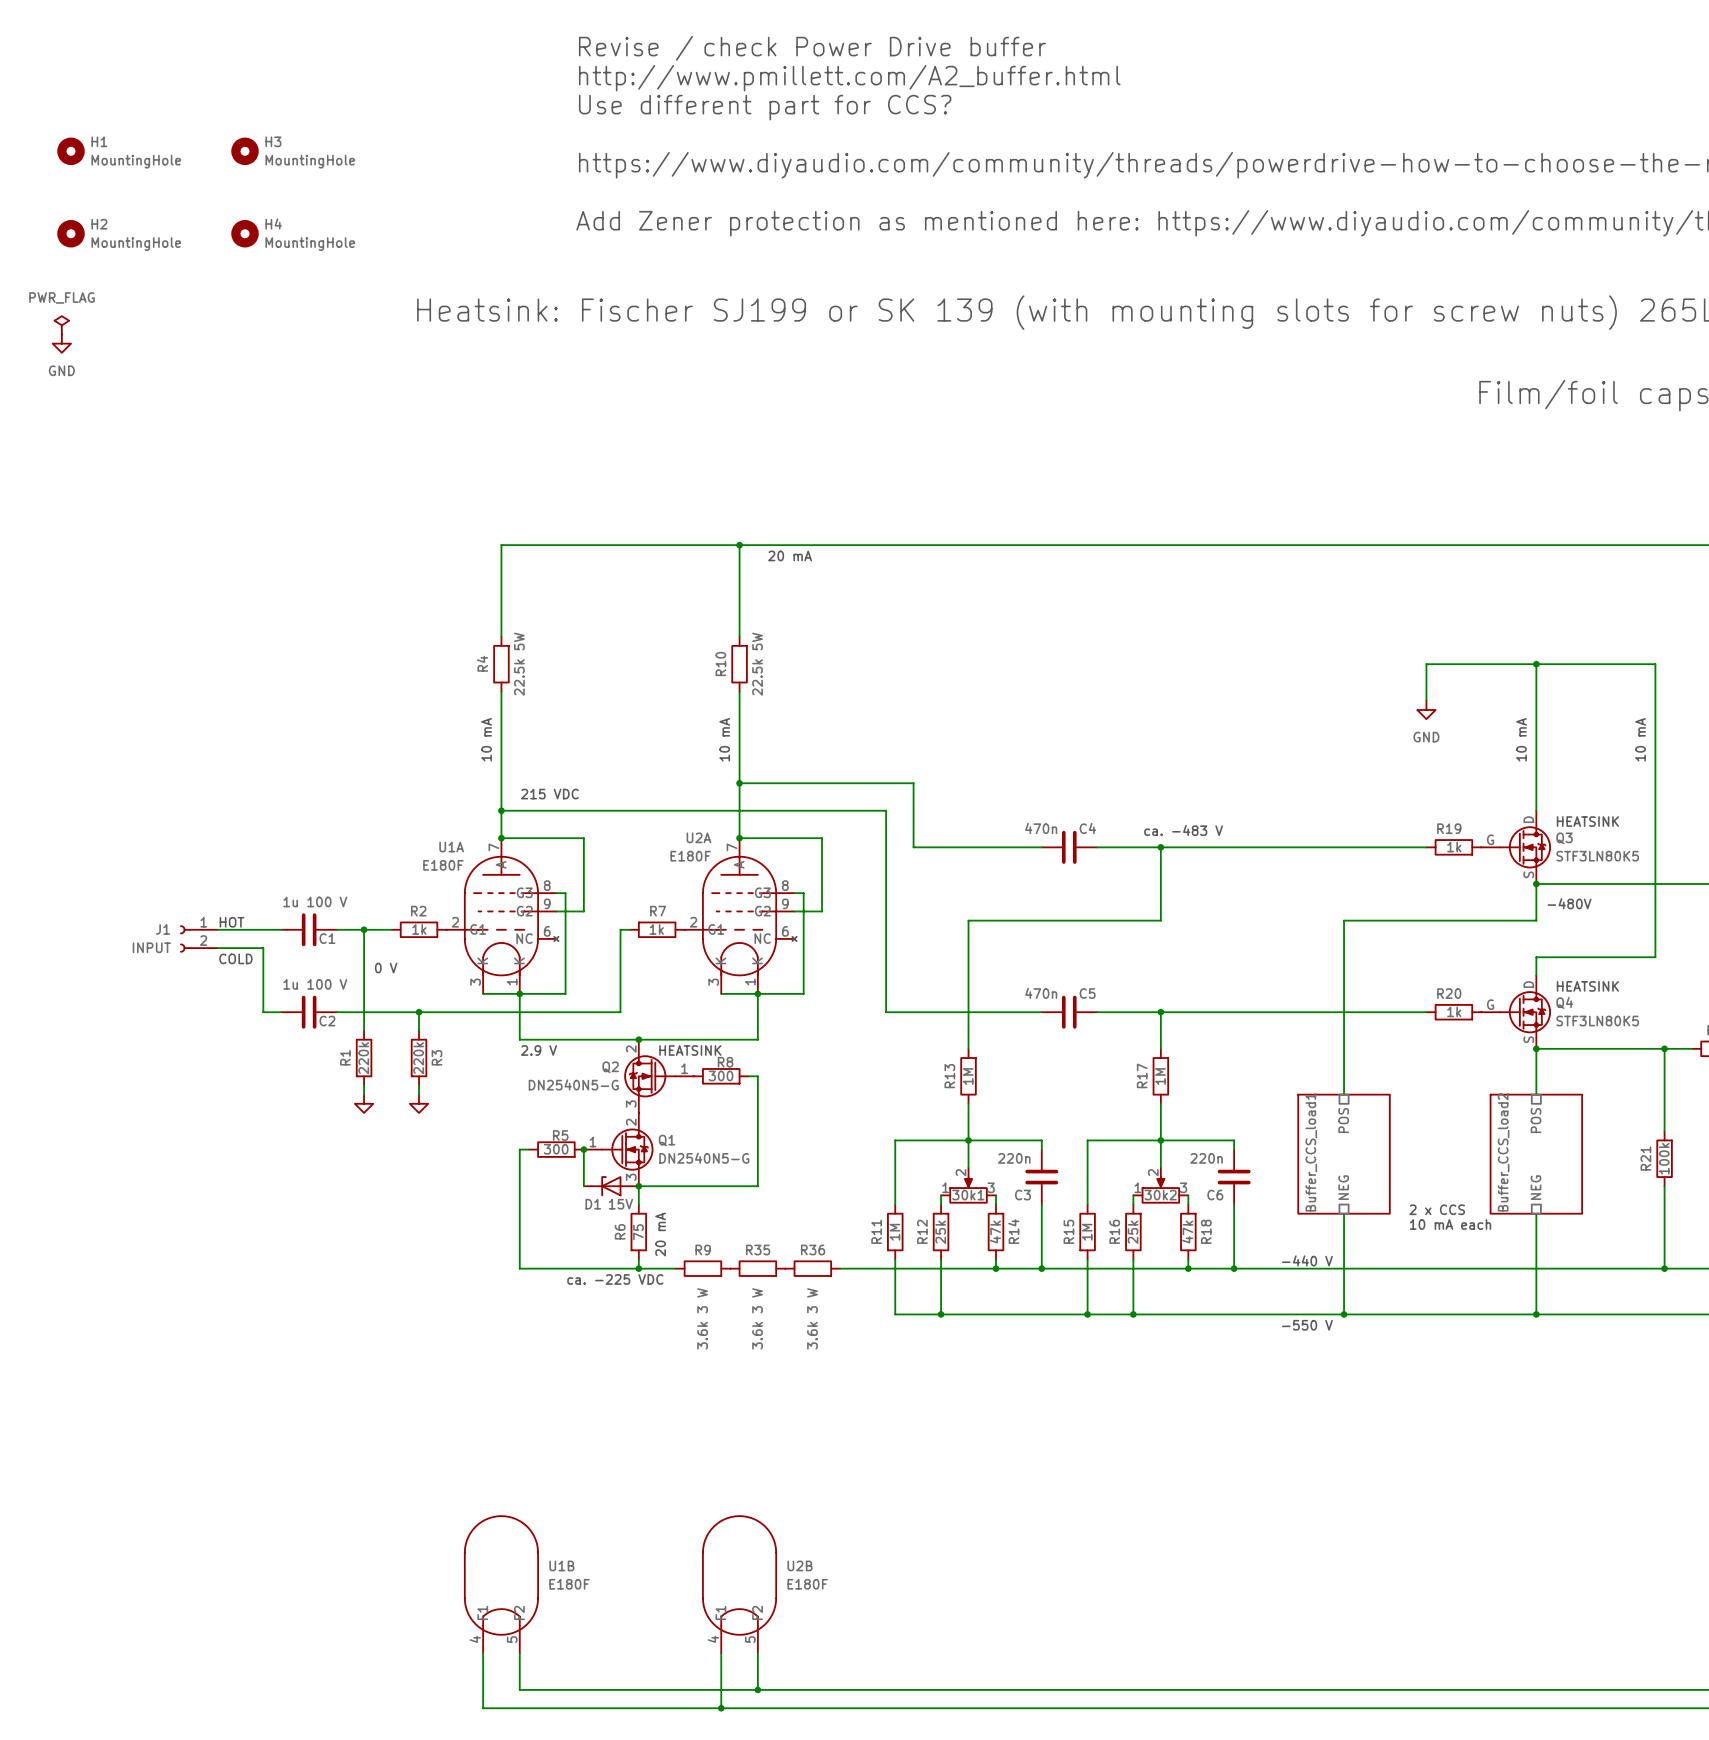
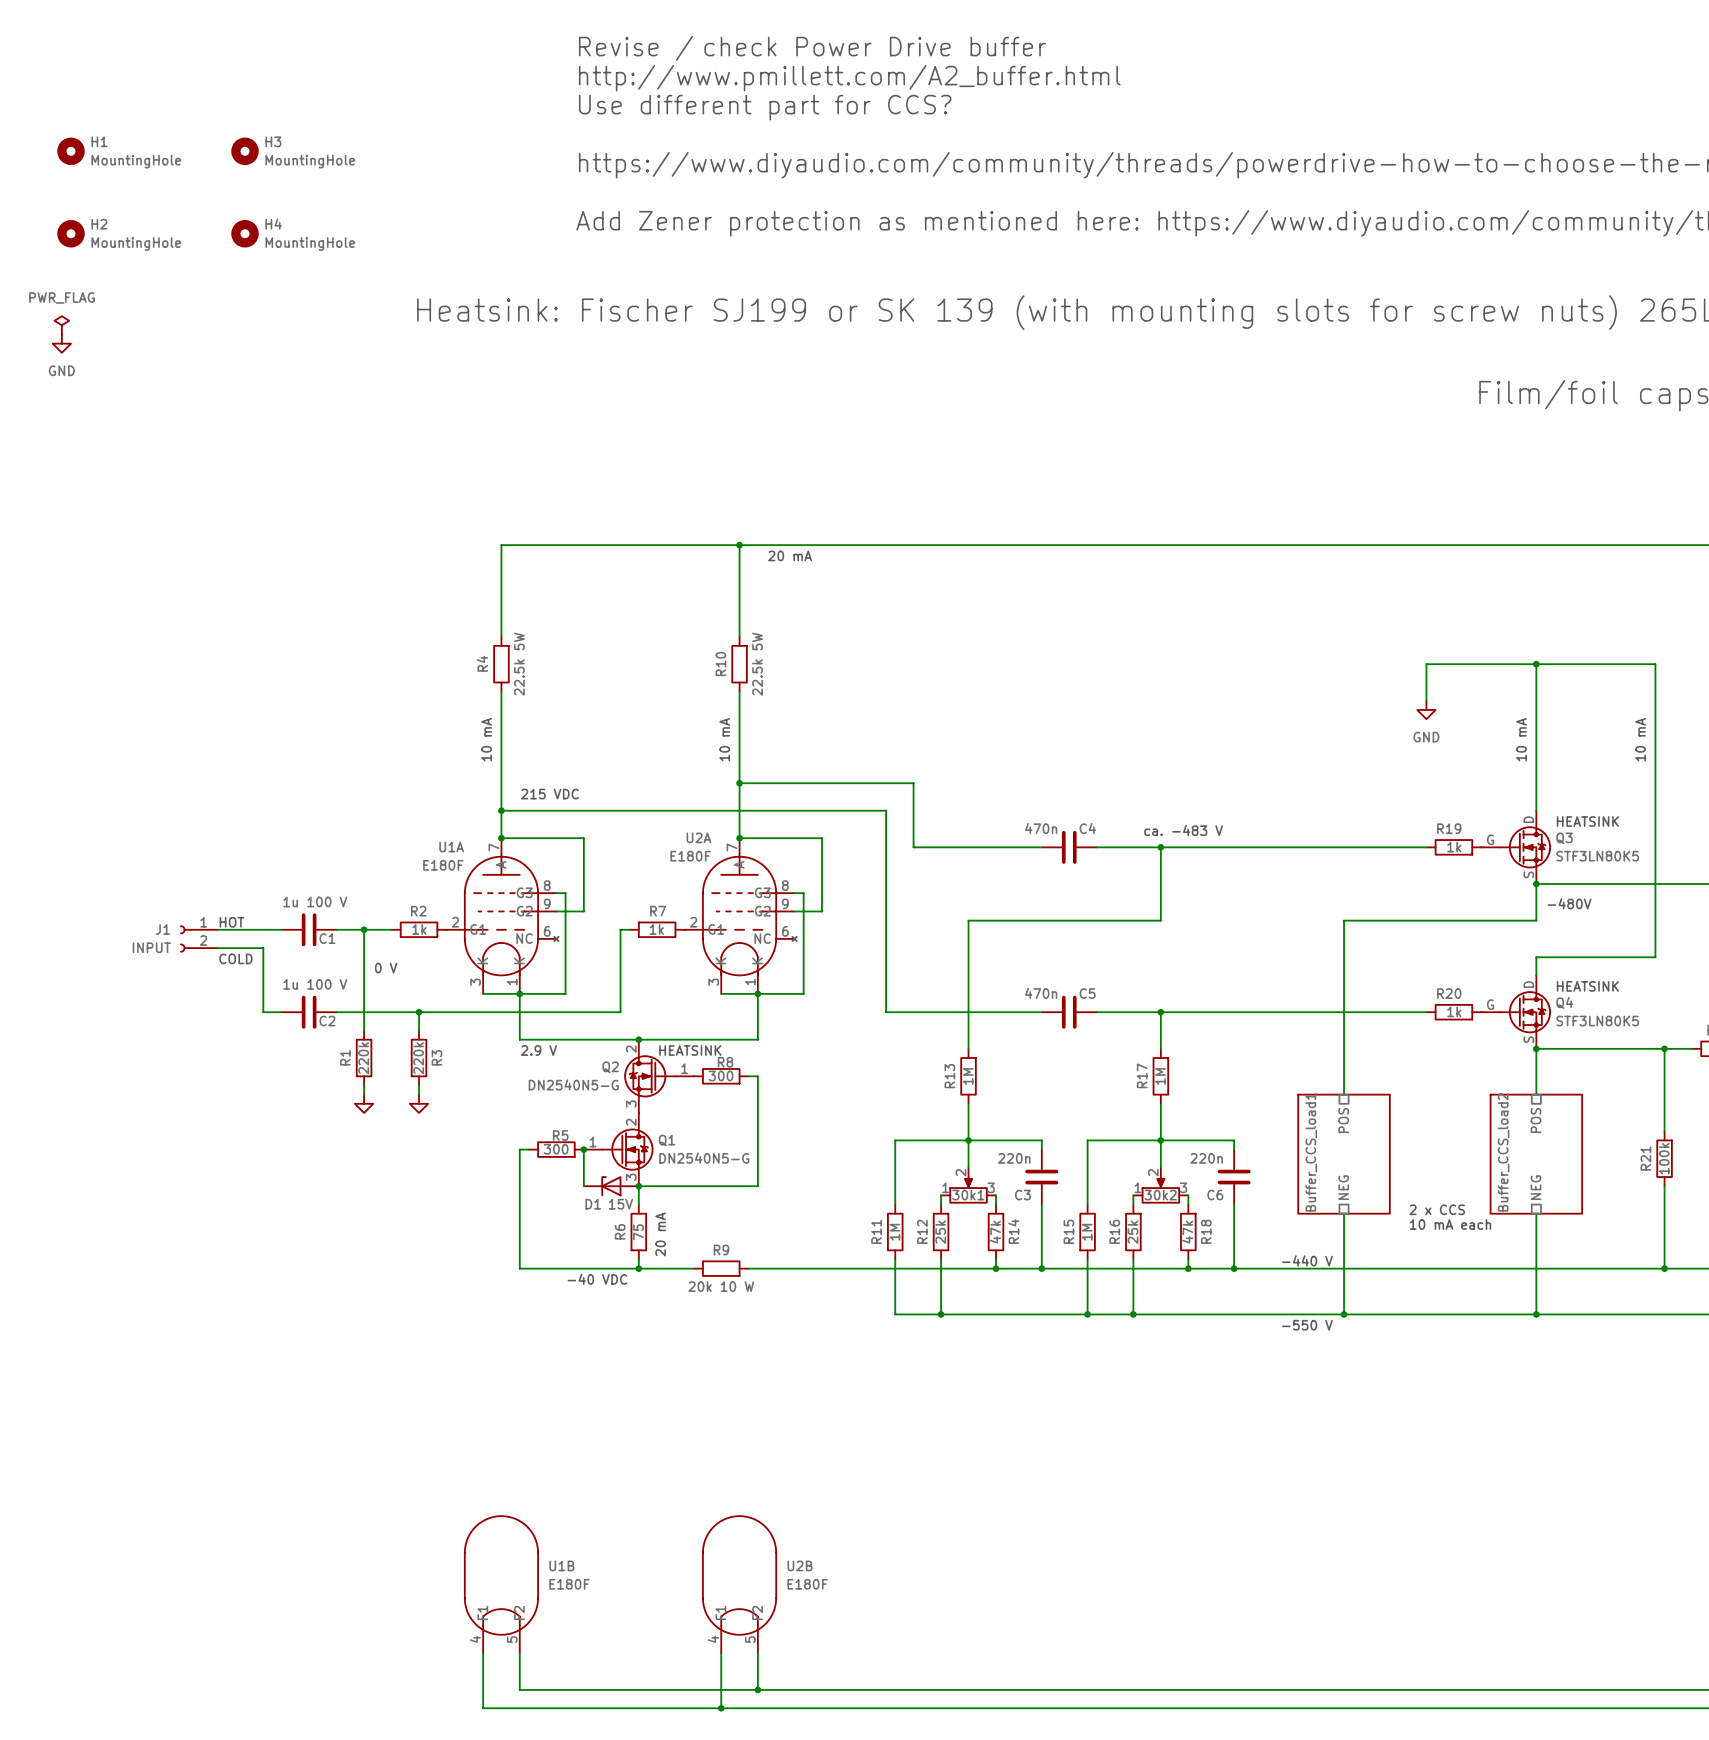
R9 position: (702, 1268) -> (721, 1268)
wire: none -> (748, 1268) (840, 1268)
R35: 3.6k 3 W (757, 1268) -> none
R36: 3.6k 3 W (812, 1268) -> none
text: ca. -225 VDC (615, 1279) -> -40 VDC (597, 1279)
R9 value: 3.6k 3 W (702, 1318) -> 20k 10 W (721, 1286)

